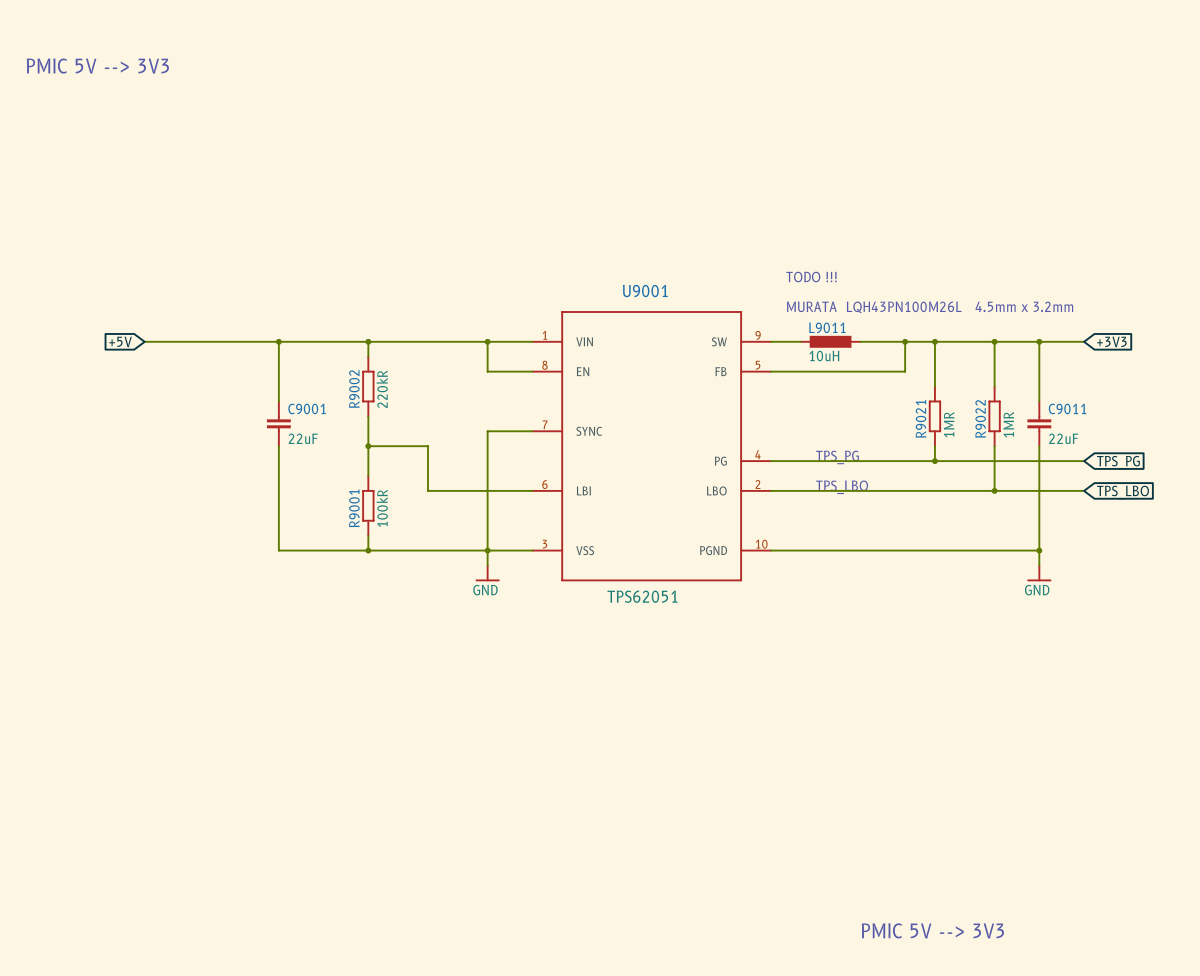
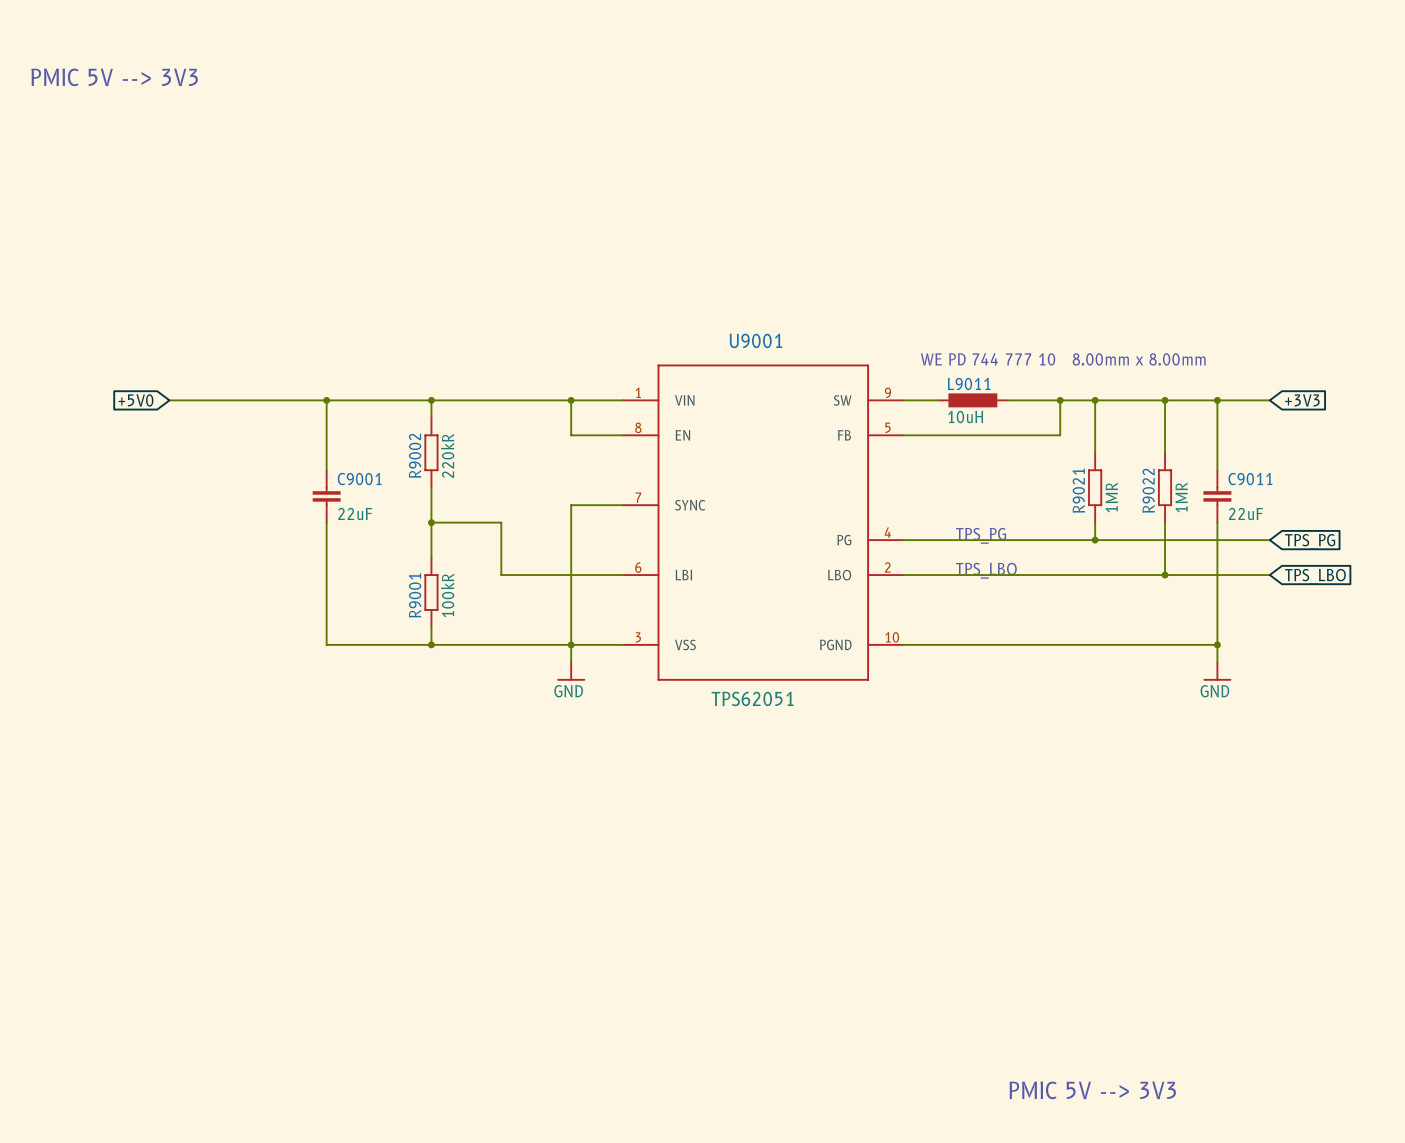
text: TODO !!! (811, 277) -> none
text: MURATA LQH43PN100M26L 4.5mm x 3.2mm (930, 307) -> WE PD 744 777 10 8.00mm x 8.00mm (1063, 359)
global label: +5V (120, 341) -> +5V0 (136, 400)

